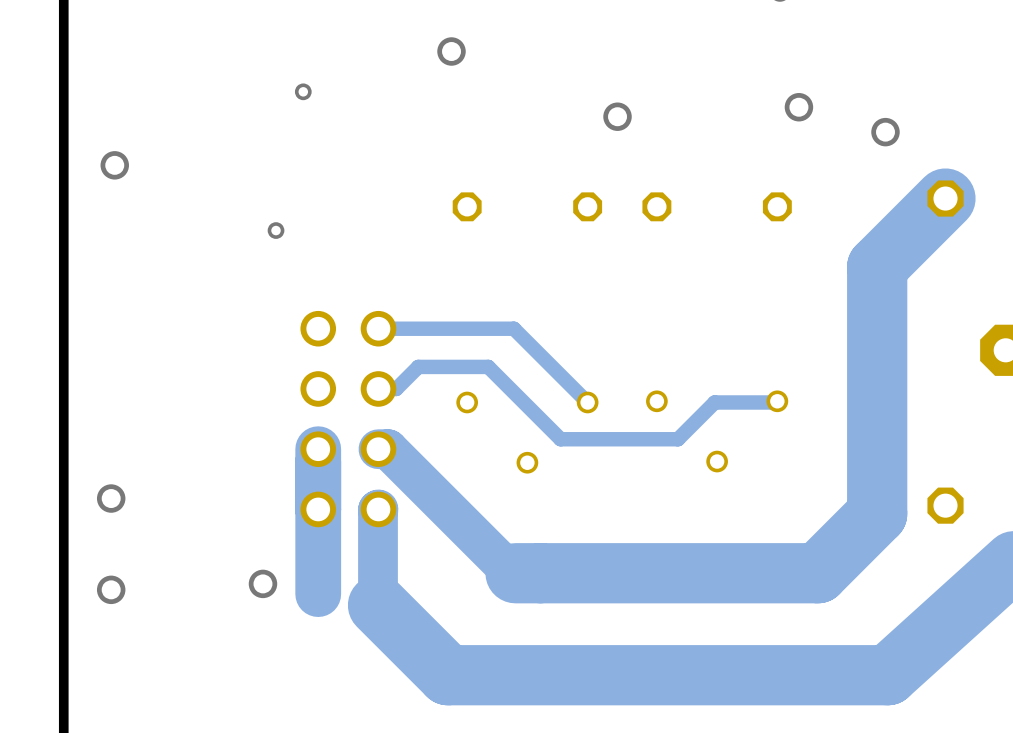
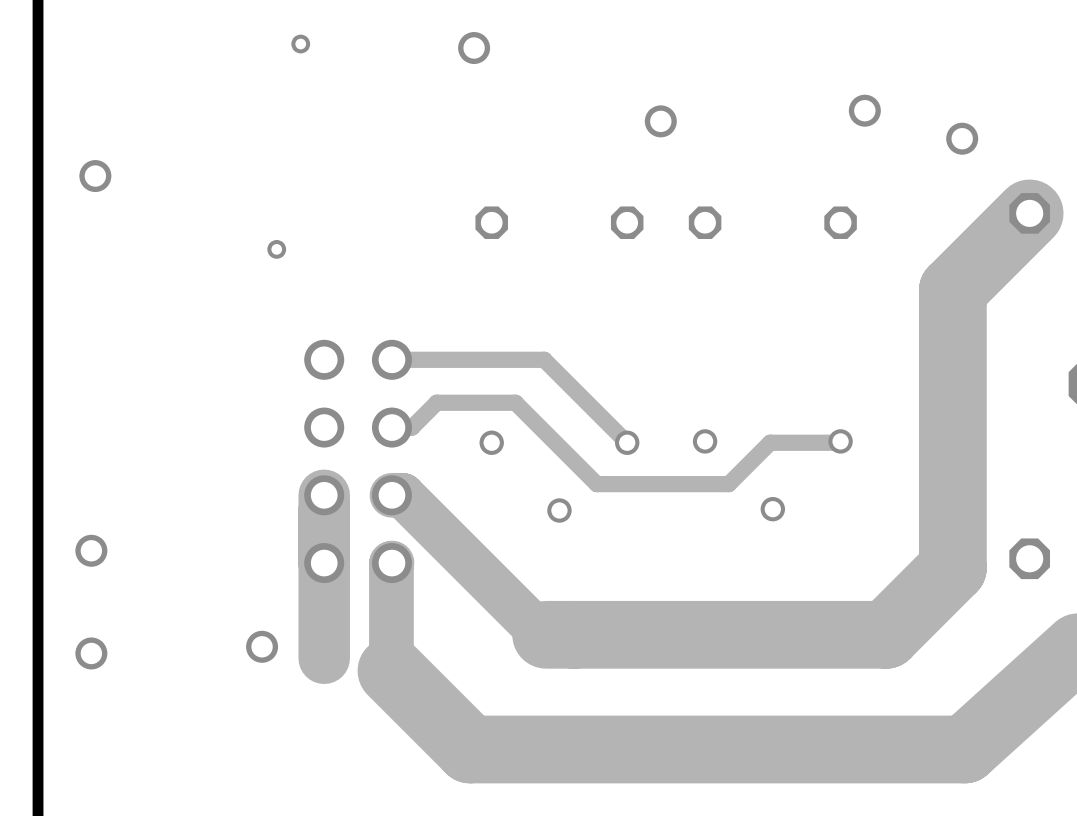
via position: (303, 91) -> (300, 44)

